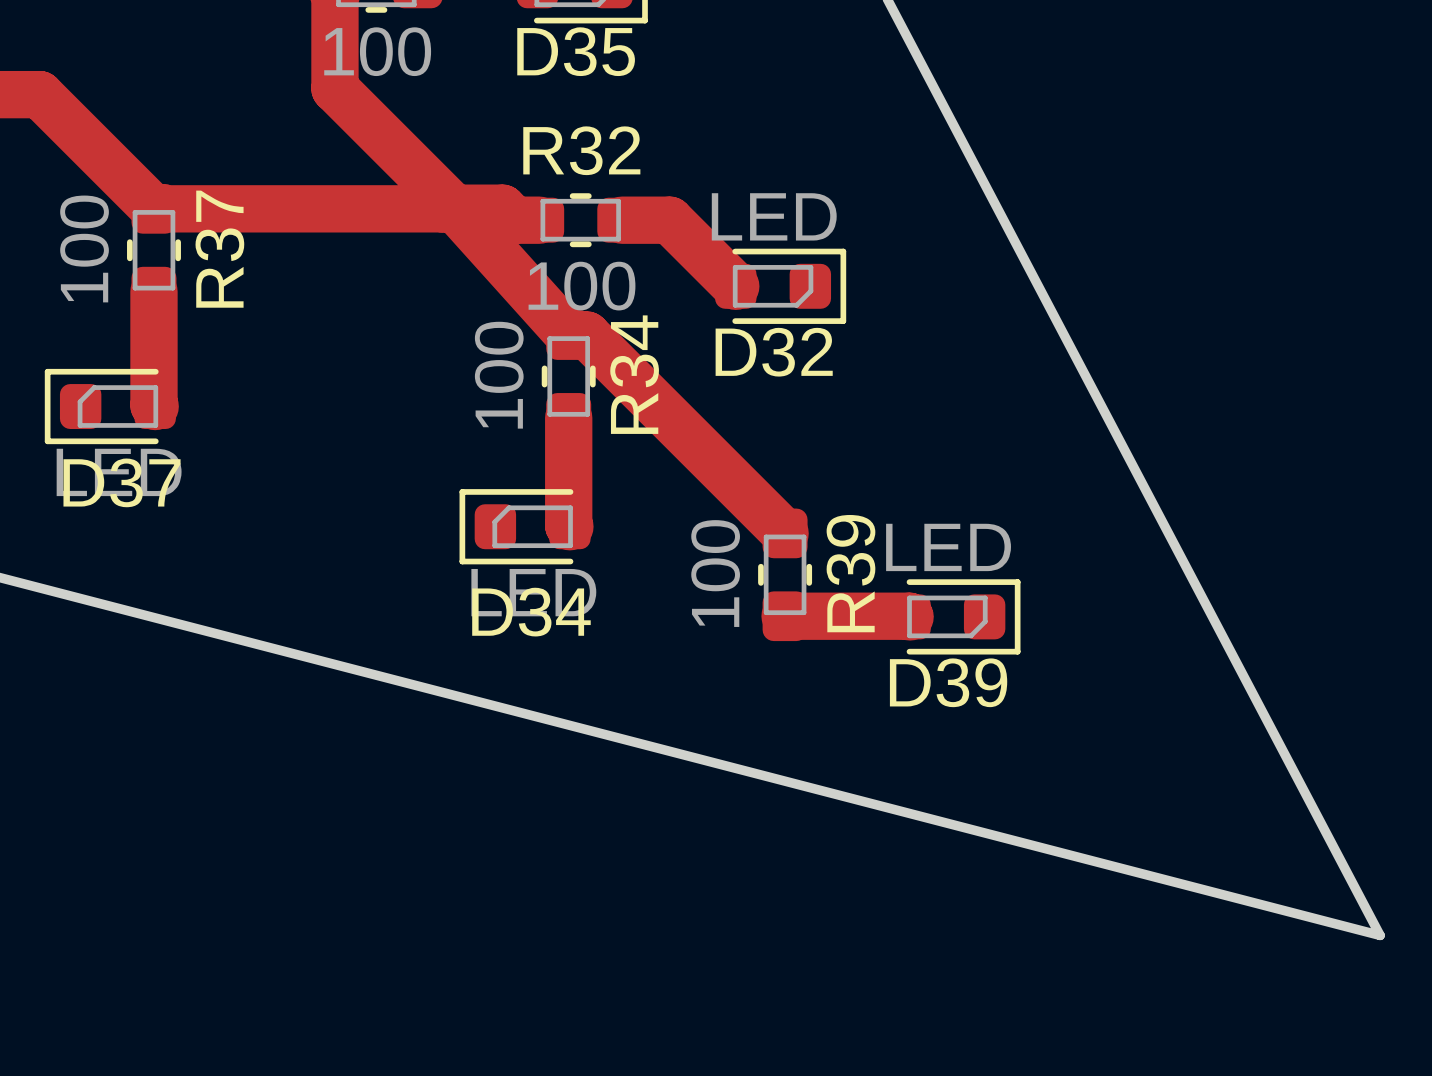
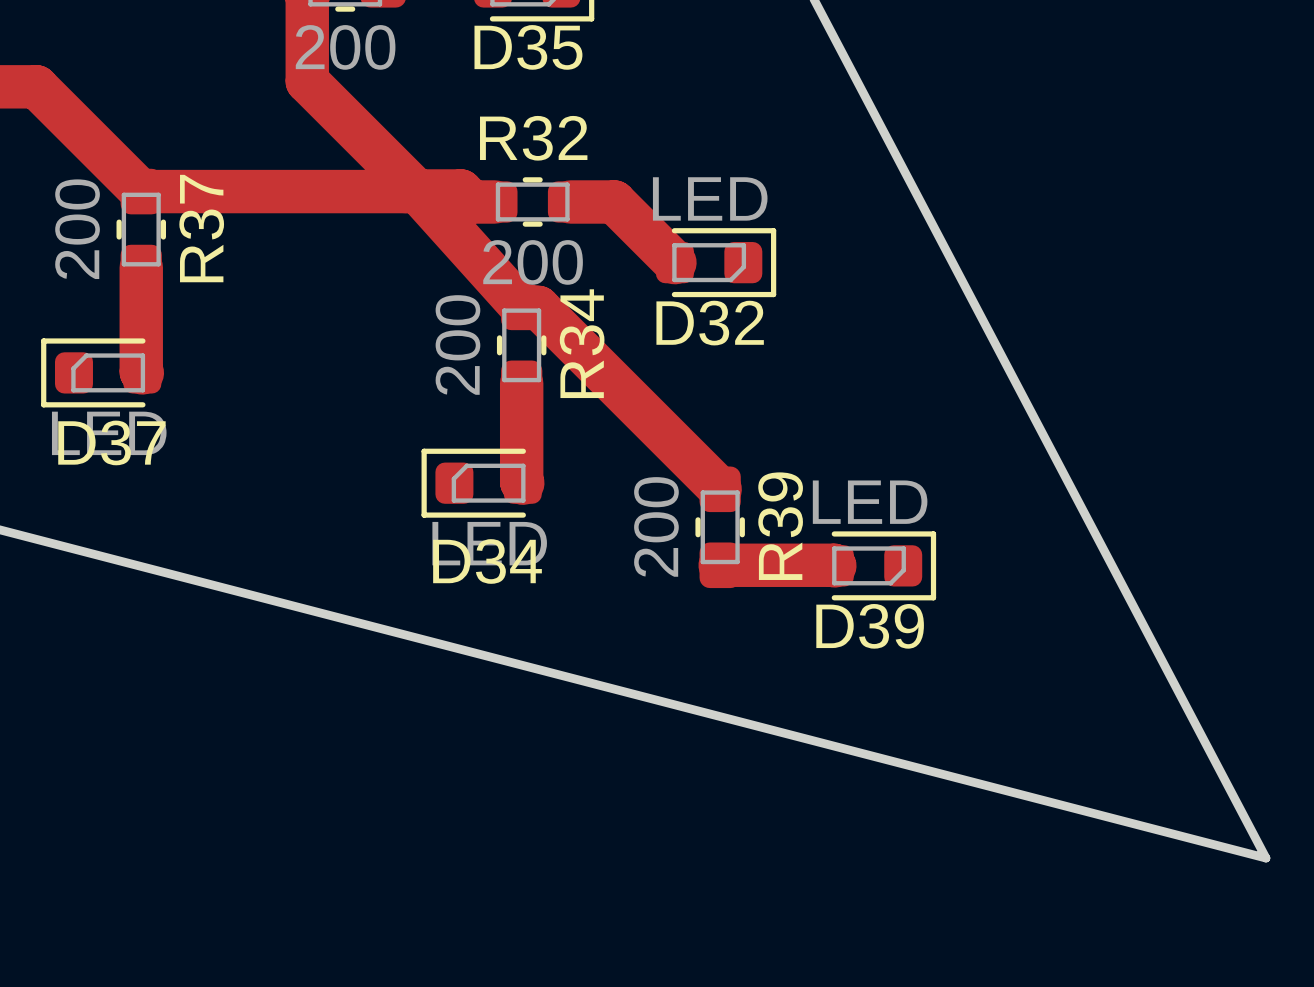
part value: 100 (377, 51) -> 200 (345, 47)
R37 value: 100 (84, 248) -> 200 (77, 229)
R32 value: 100 (582, 286) -> 200 (533, 262)
R34 value: 100 (499, 375) -> 200 (457, 344)
R39 value: 100 (715, 573) -> 200 (656, 526)

